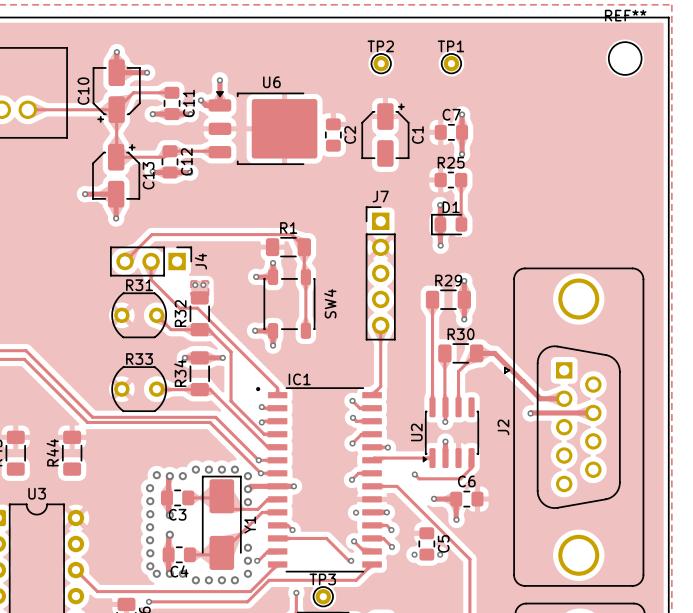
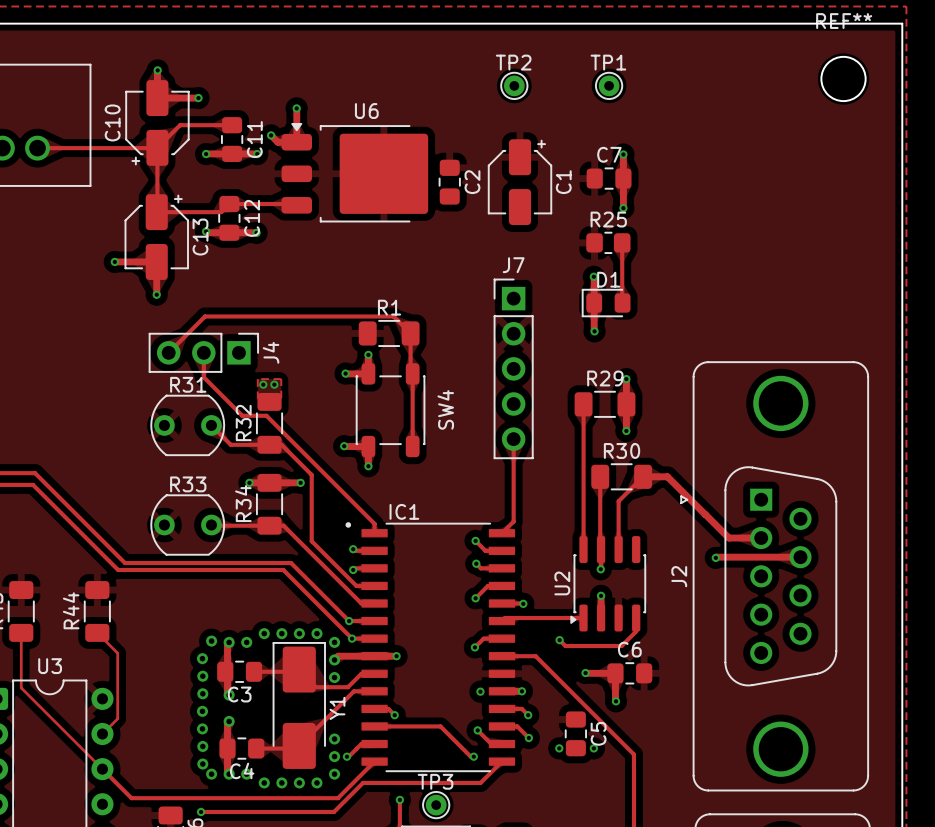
track: none -> (21, 632) (21, 687) (102, 769)
track: none -> (97, 632) (117, 653) (117, 718) (102, 734)

